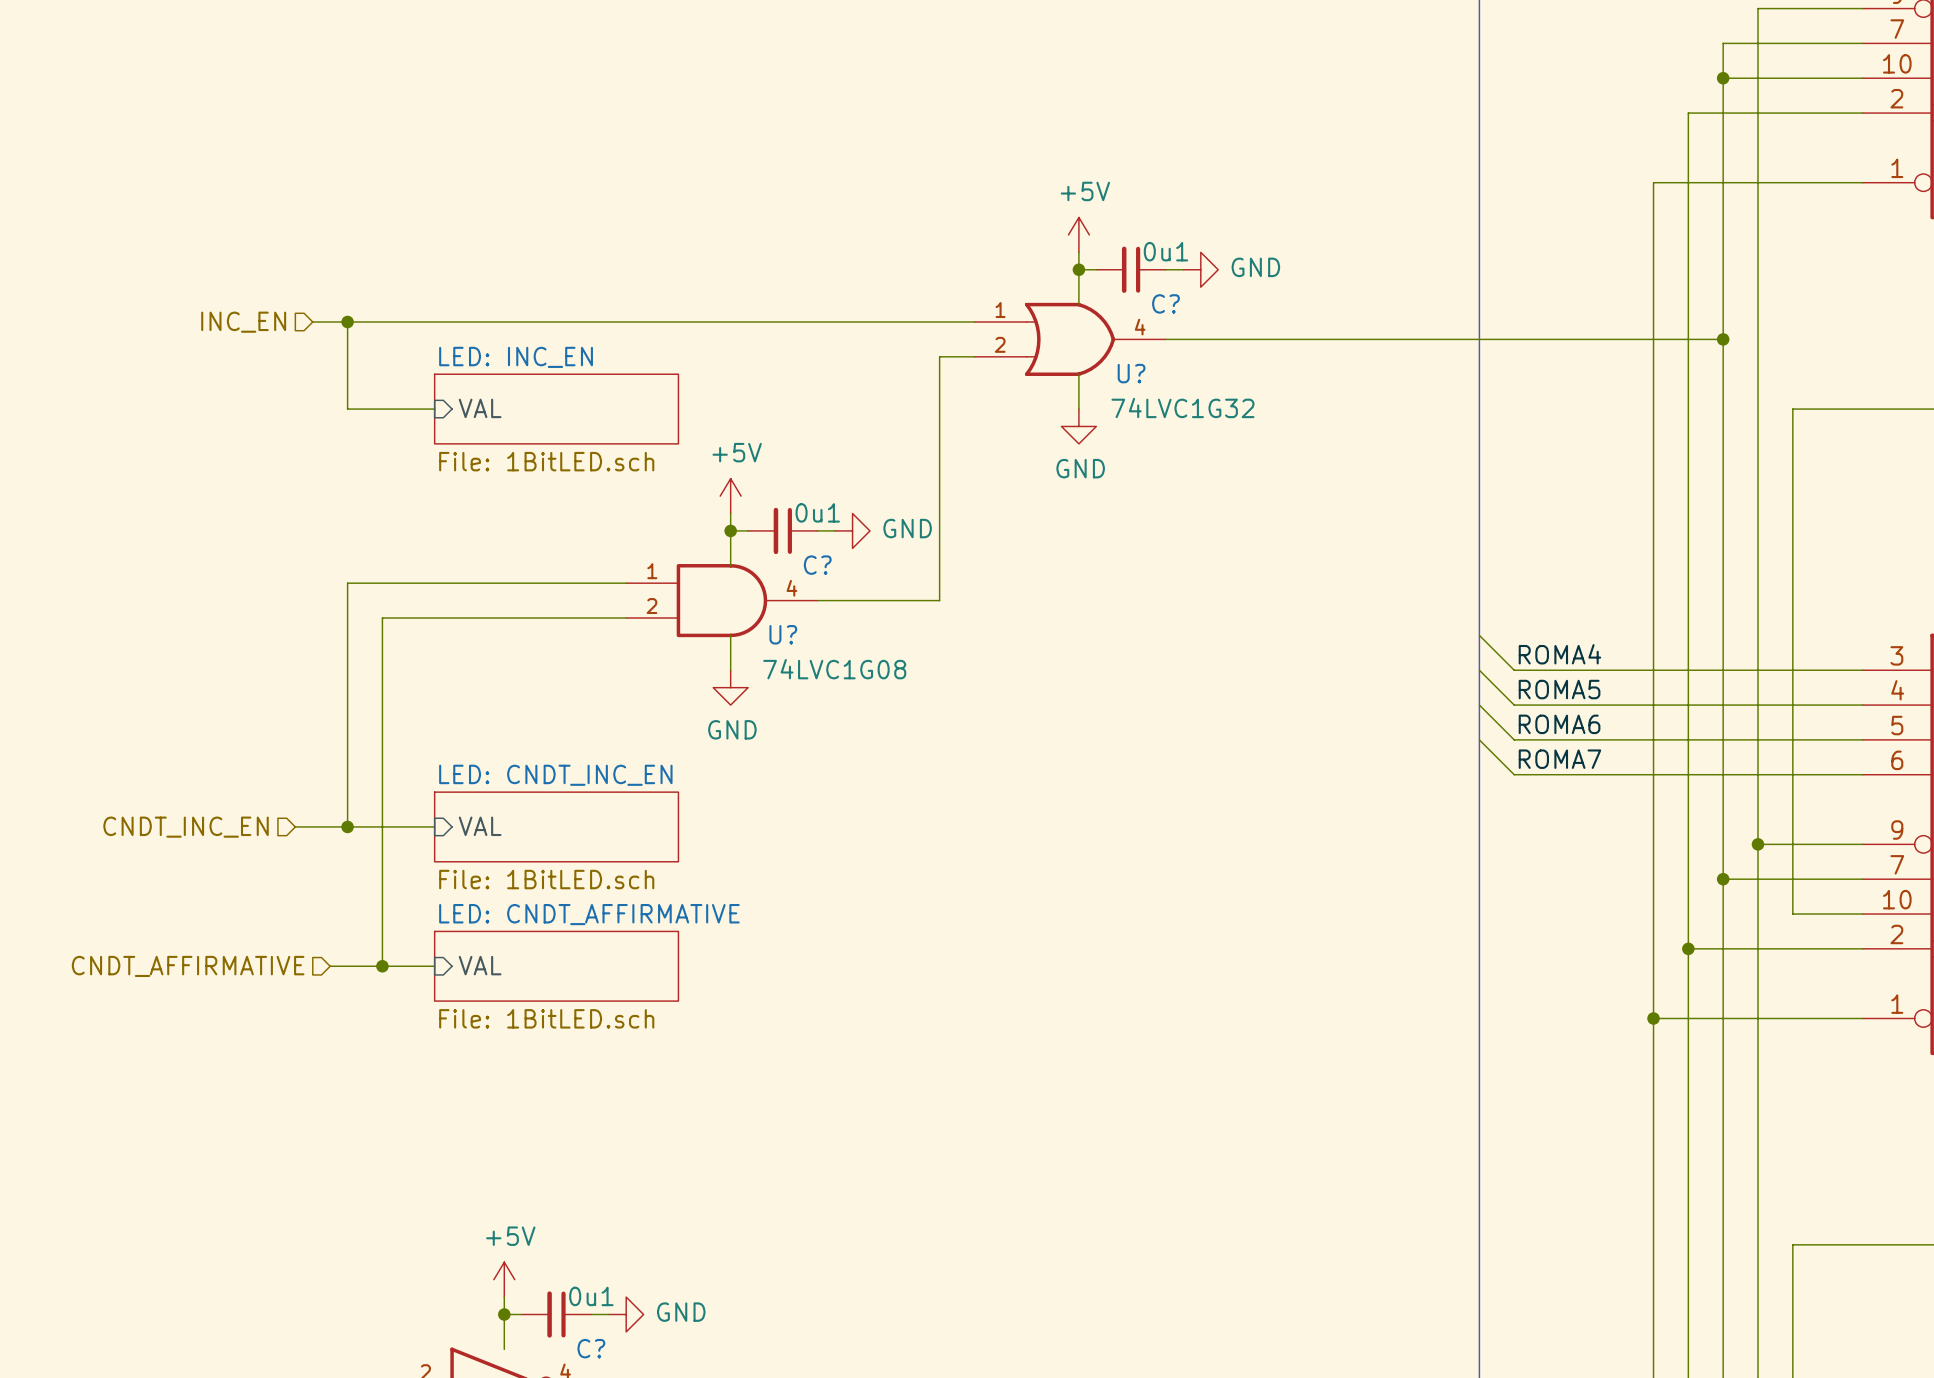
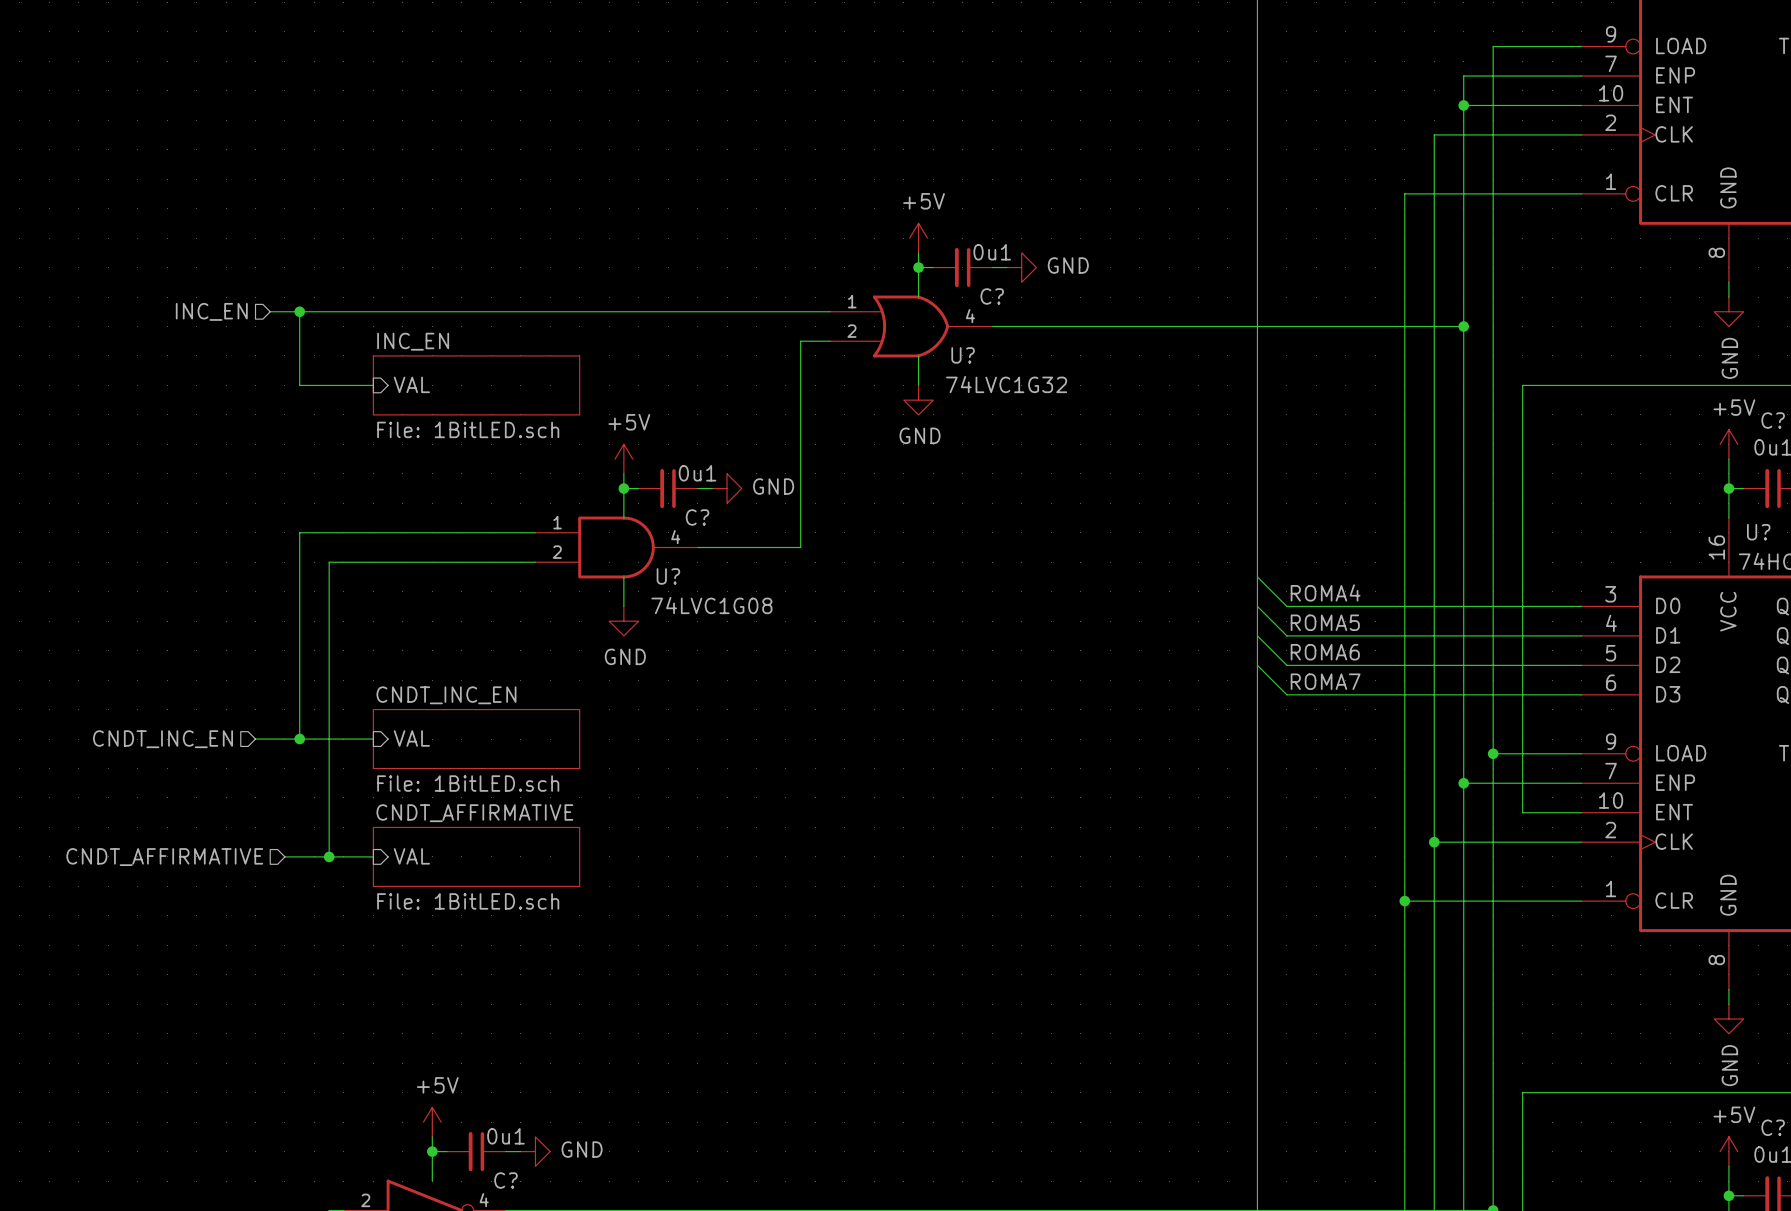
sheet INC_EN name: LED: INC_EN (516, 357) -> INC_EN (413, 341)
sheet CNDT_INC_EN name: LED: CNDT_INC_EN (555, 775) -> CNDT_INC_EN (446, 695)
sheet CNDT_AFFIRMATIVE name: LED: CNDT_AFFIRMATIVE (589, 914) -> CNDT_AFFIRMATIVE (474, 813)

